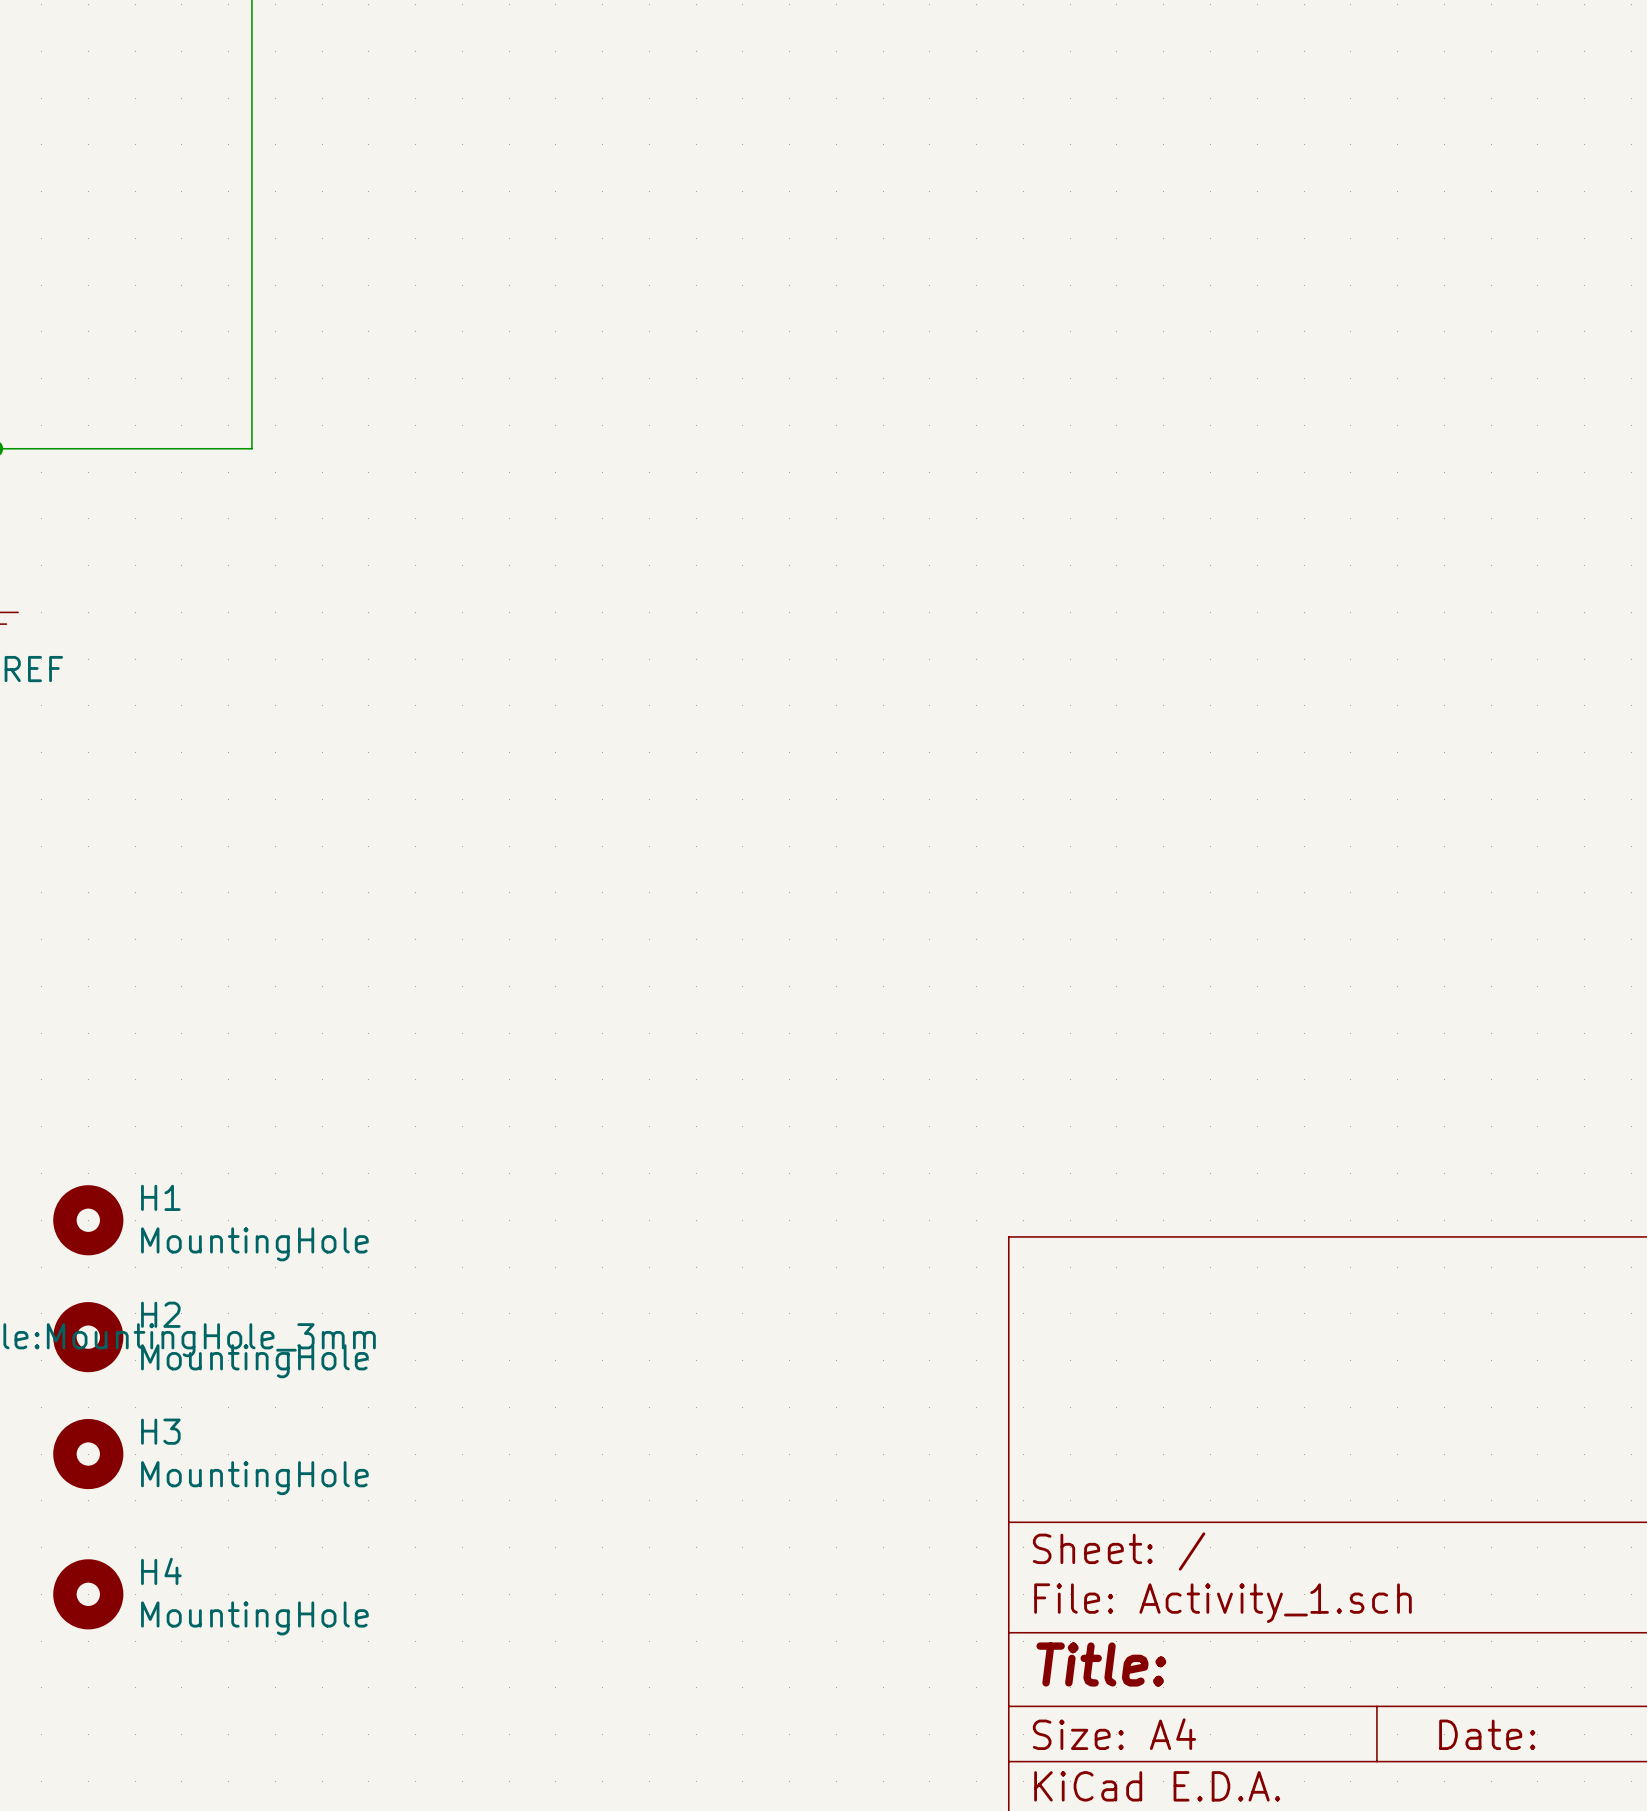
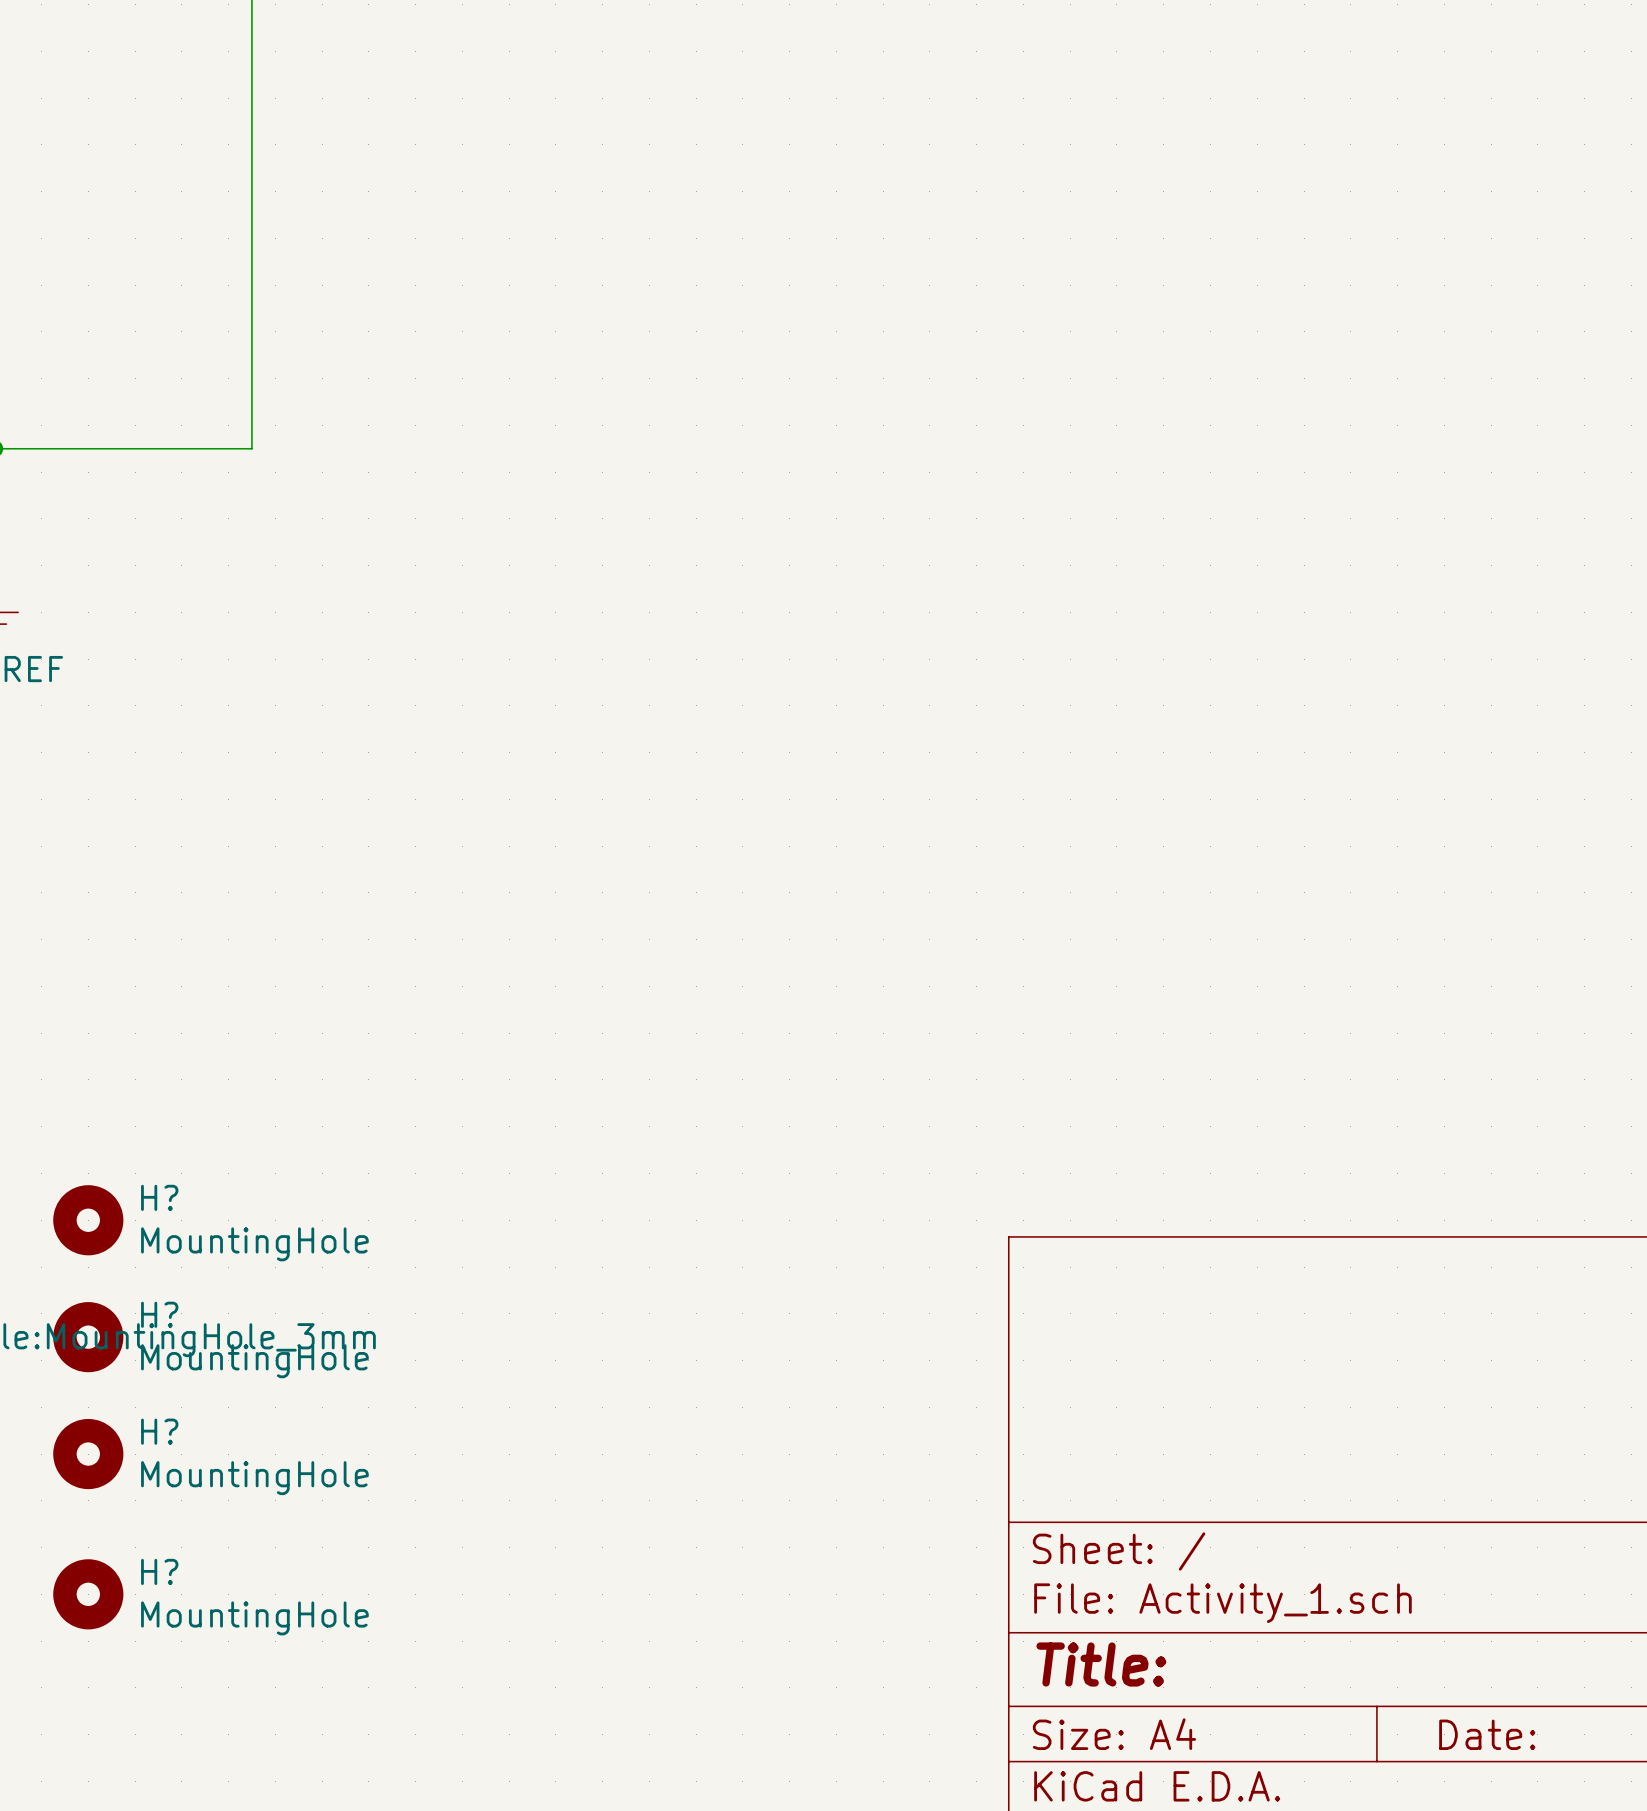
H1 name: H1 (160, 1197) -> H? (159, 1197)
H2 name: H2 (160, 1314) -> H? (159, 1314)
H3 name: H3 (160, 1431) -> H? (159, 1431)
H4 name: H4 (161, 1571) -> H? (159, 1571)

